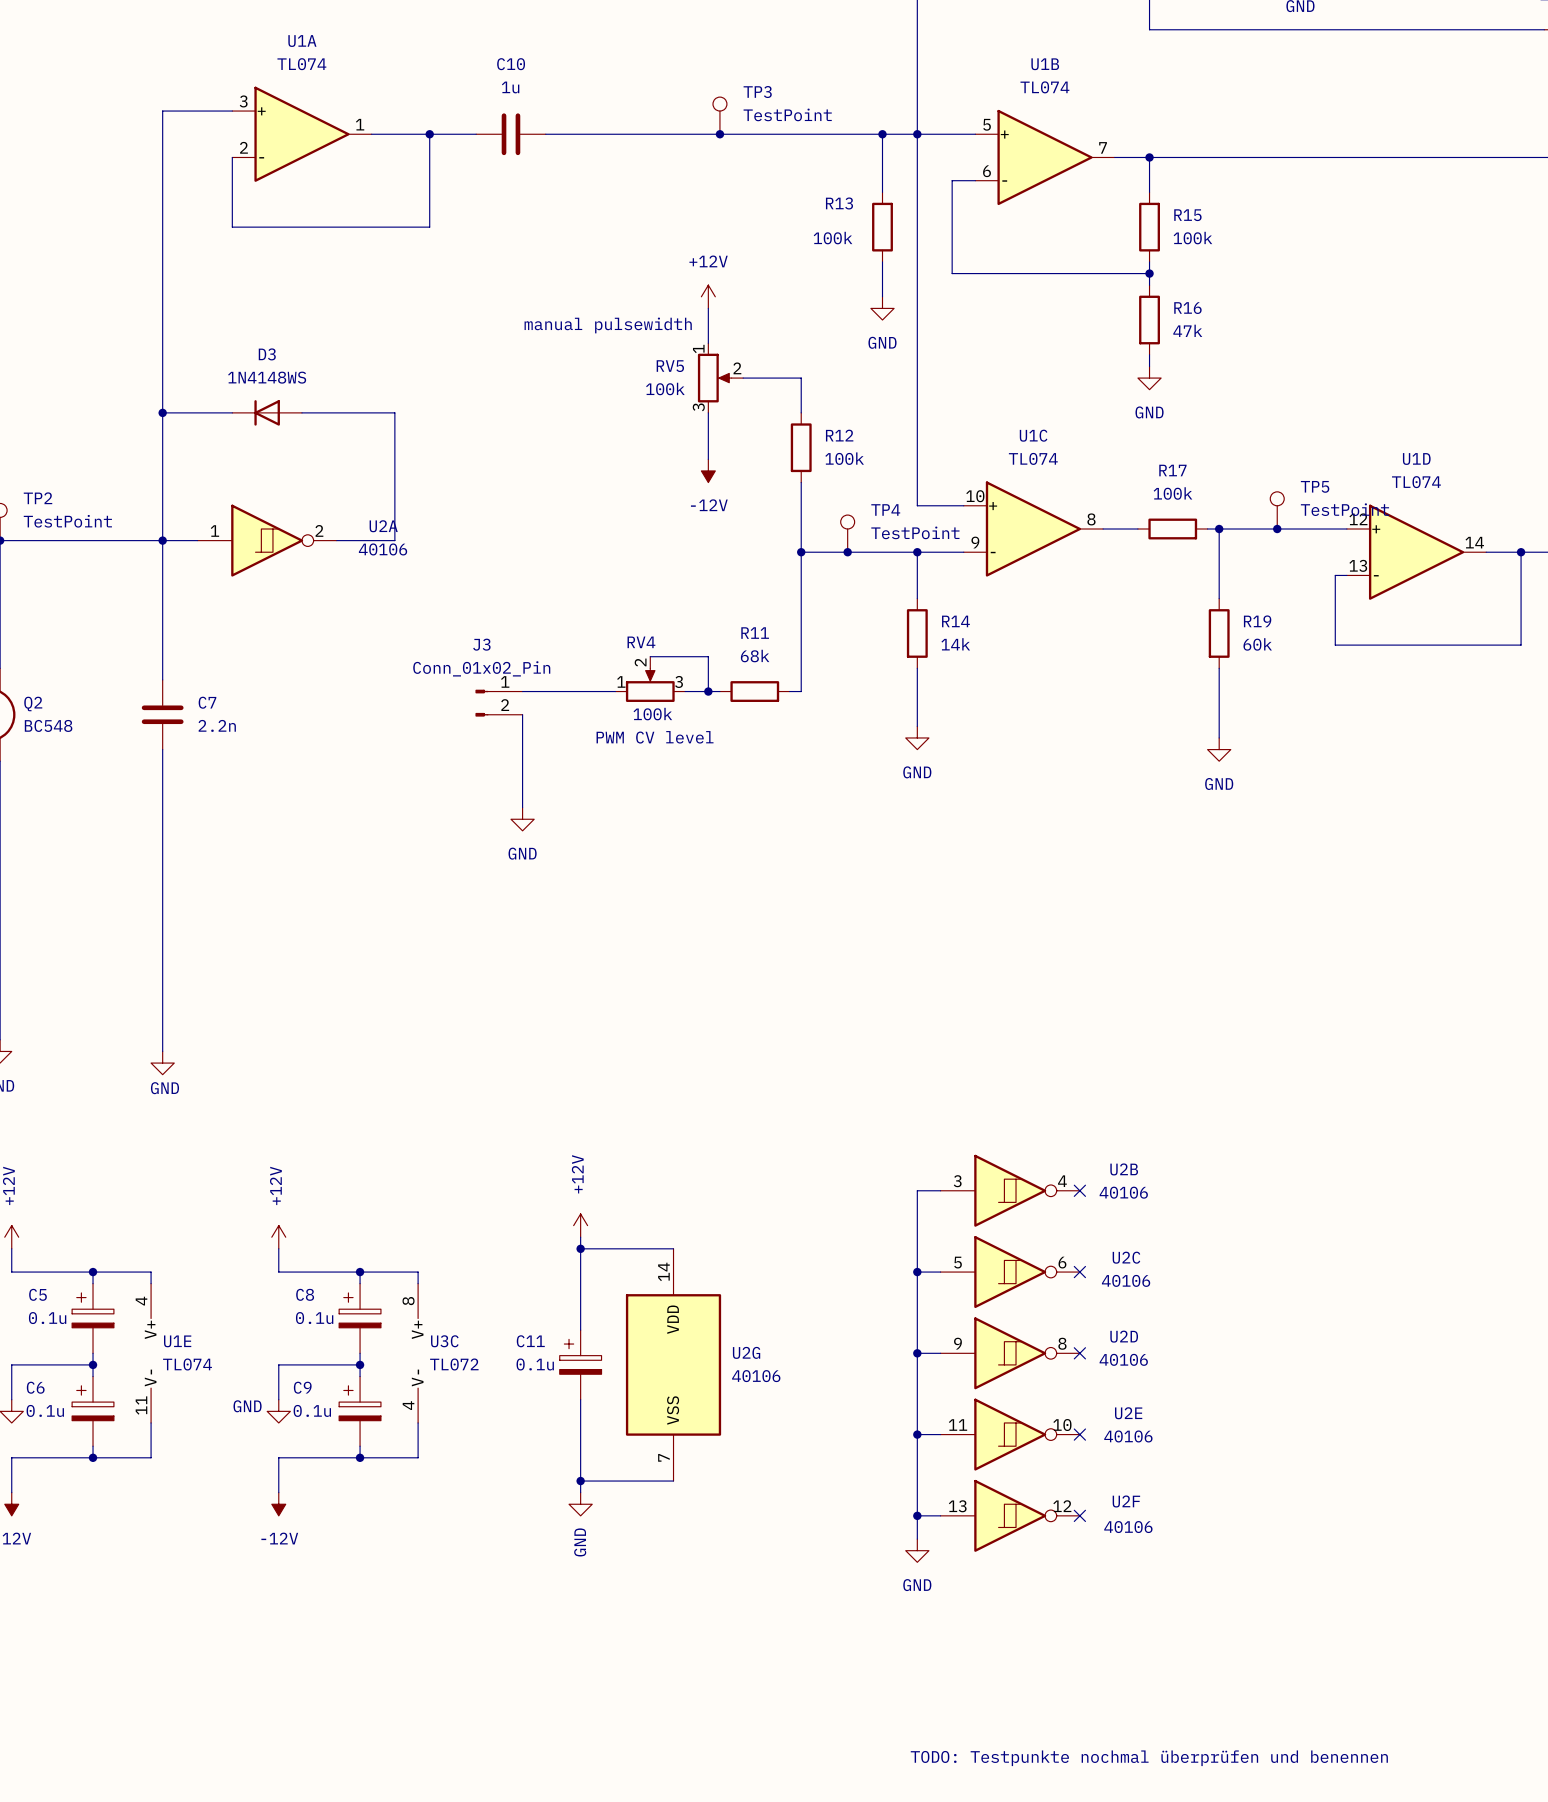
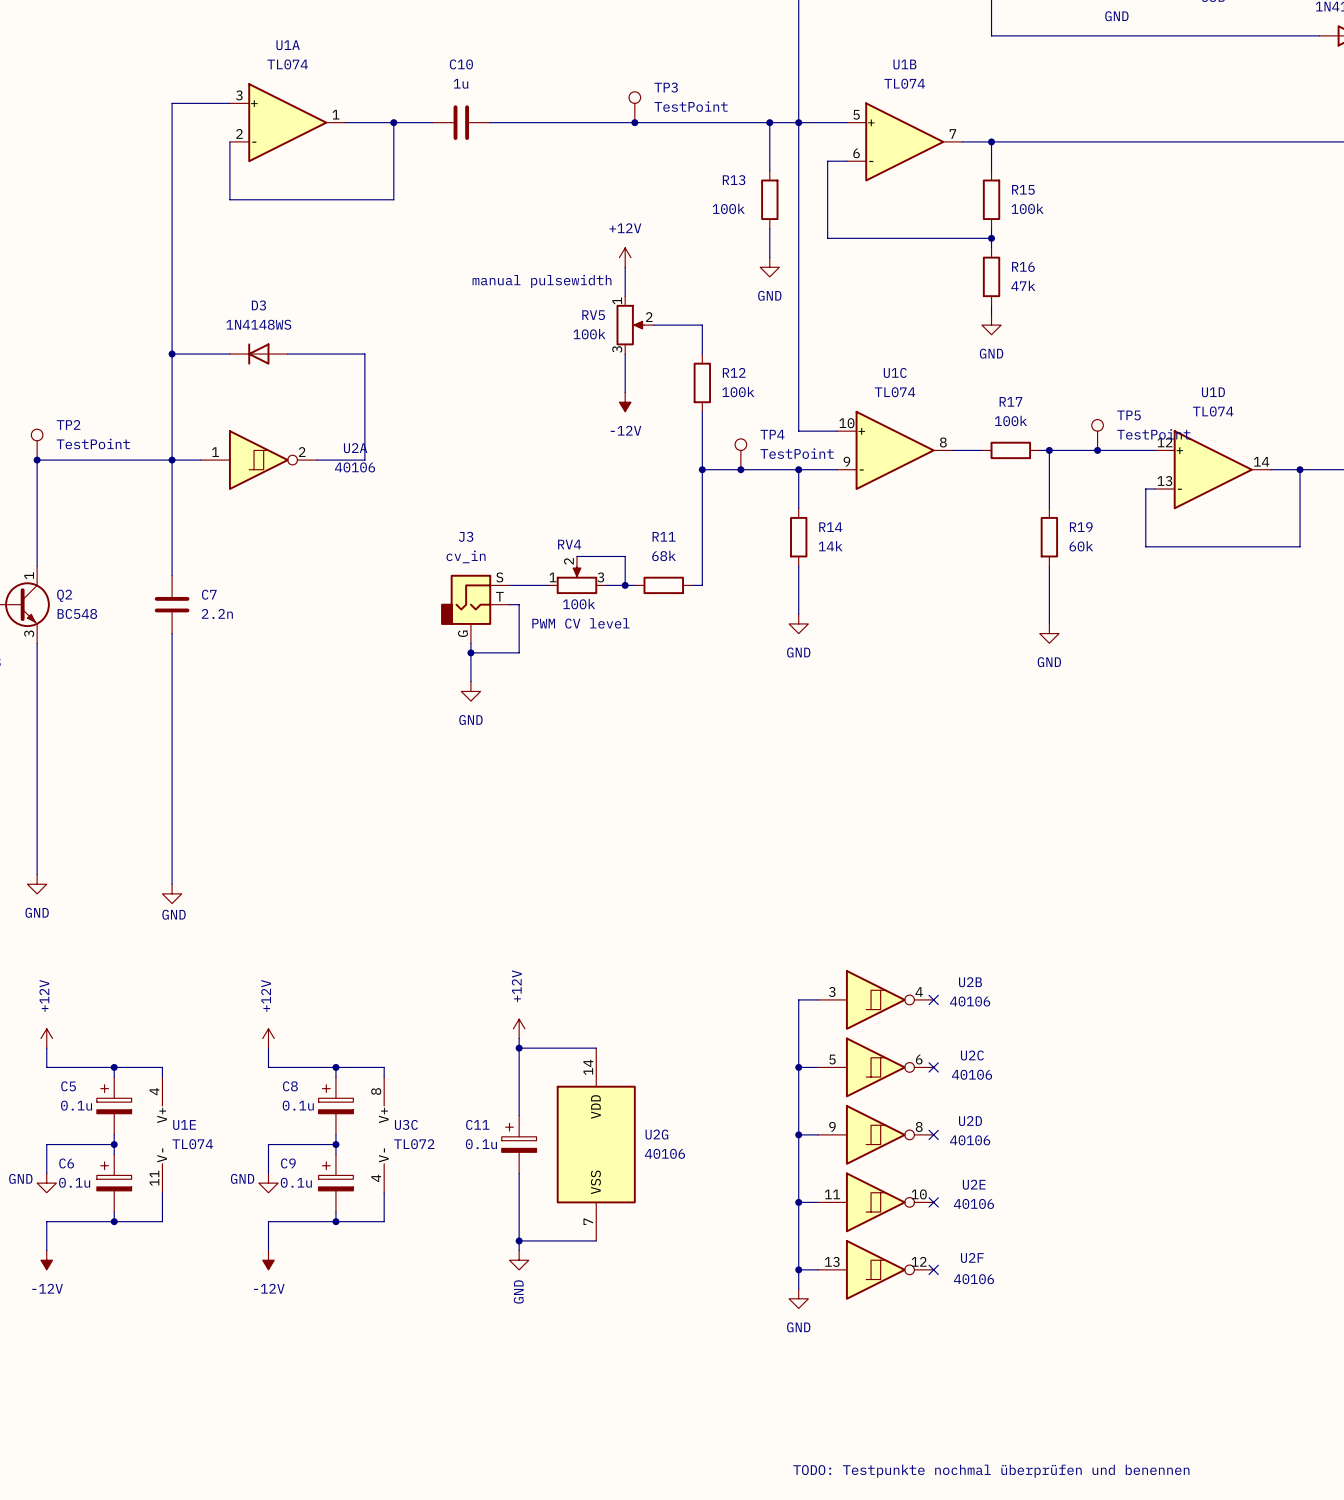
J3 name position: J3 (481, 644) -> J3 (466, 536)
J3 value: Conn_01x02_Pin (481, 668) -> cv_in (466, 556)
J3 symbol: [475, 689, 523, 717] -> [441, 574, 510, 644]
wire: none -> (509, 604) (519, 604) (519, 652) (470, 652)
junction: none -> (470, 652)

